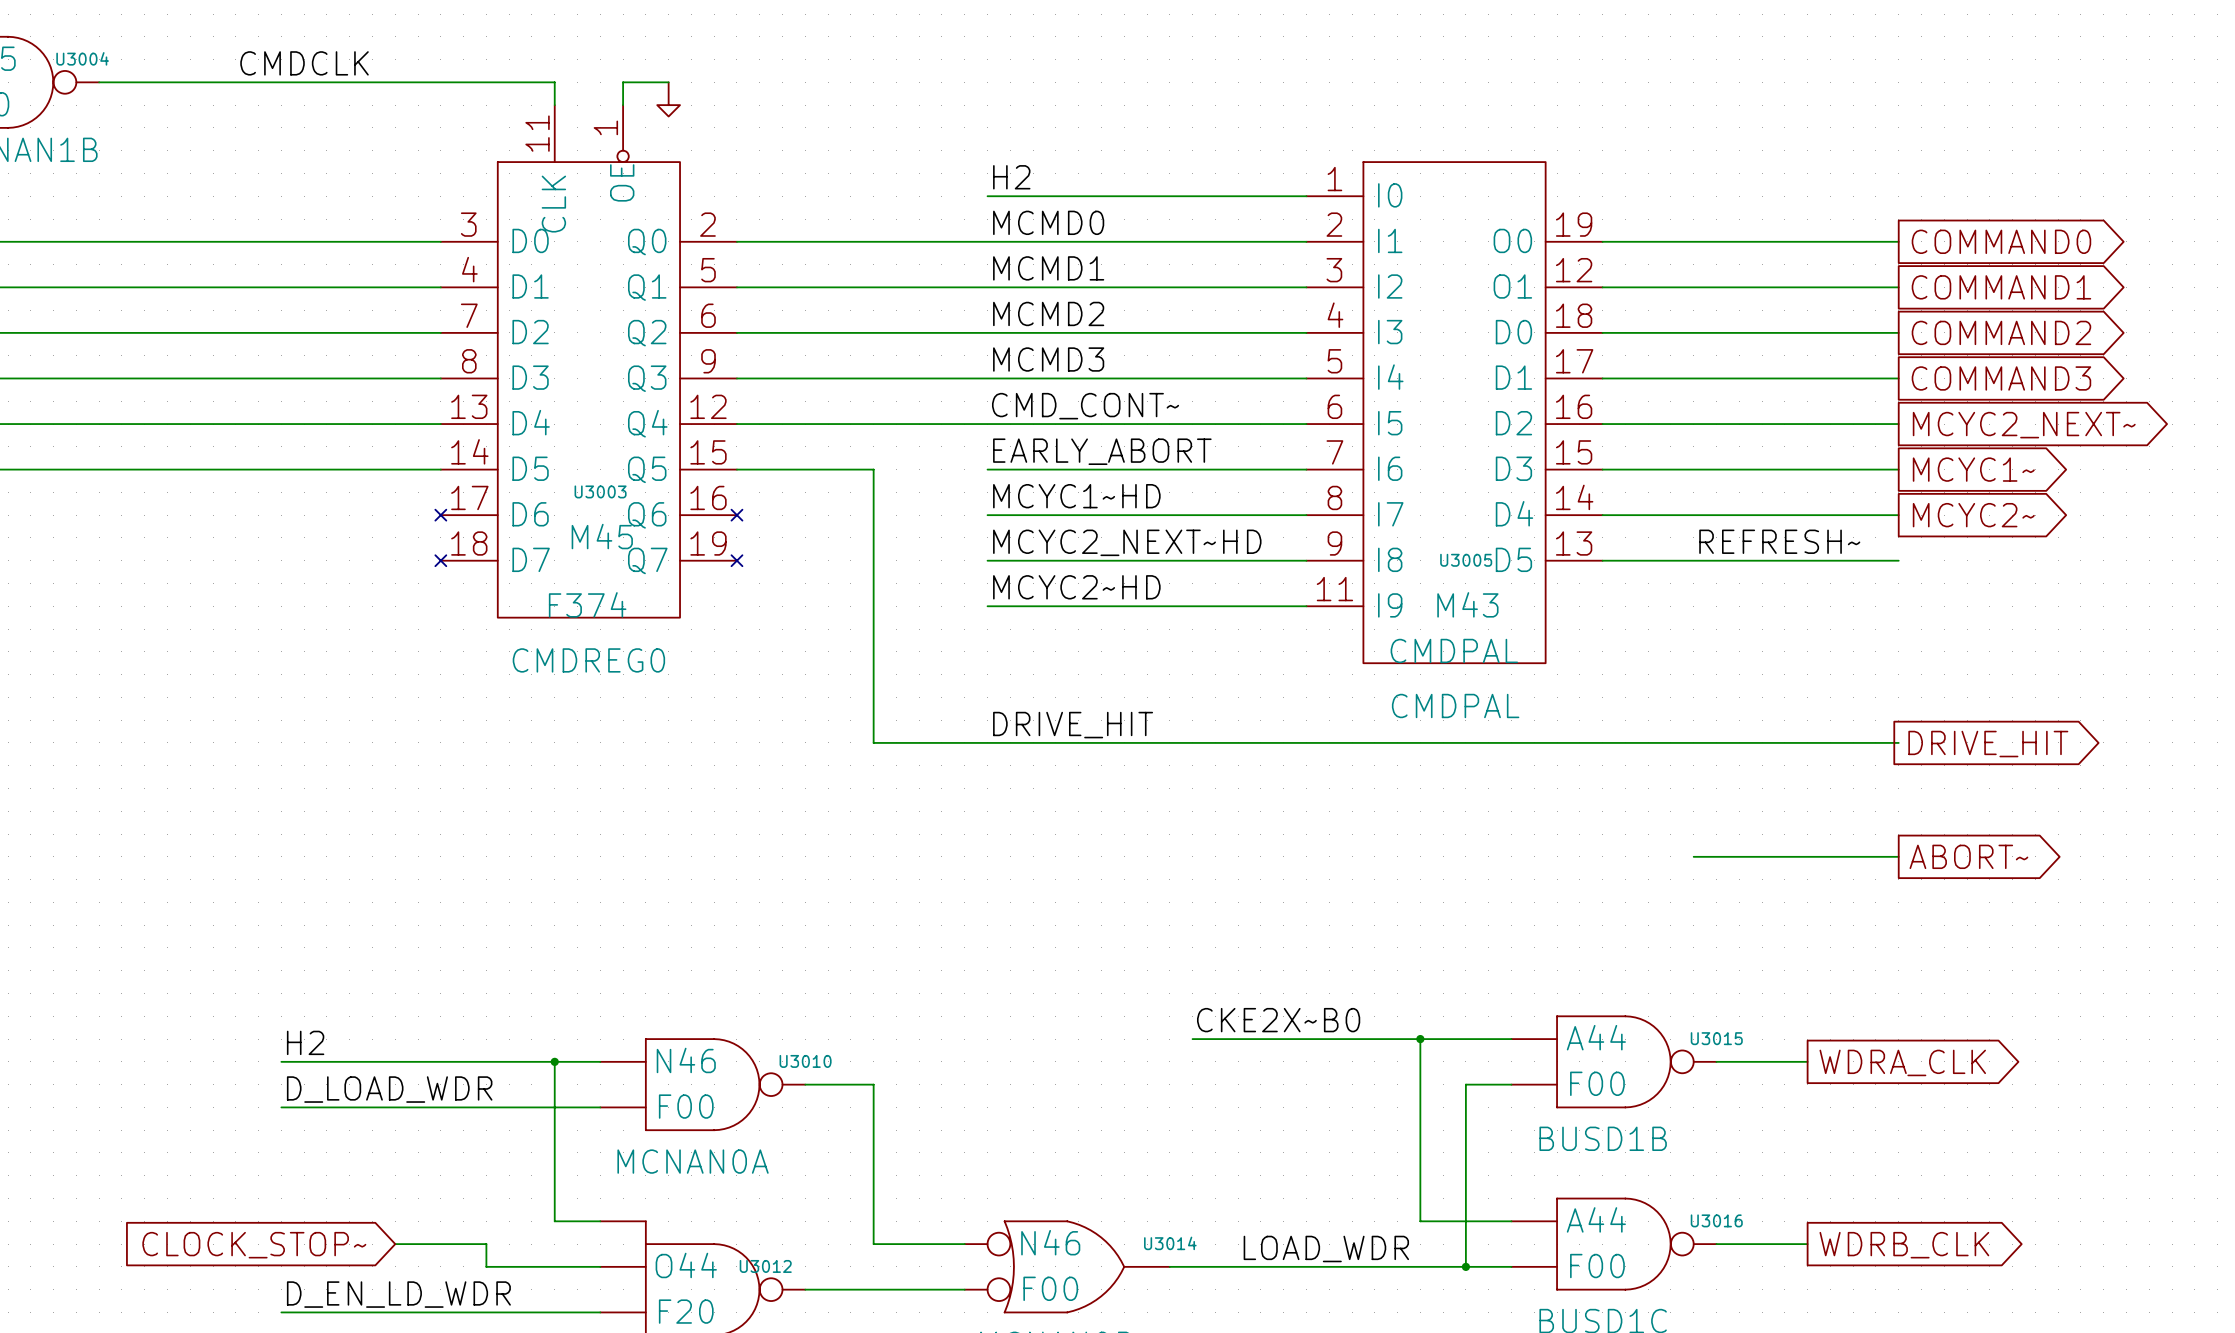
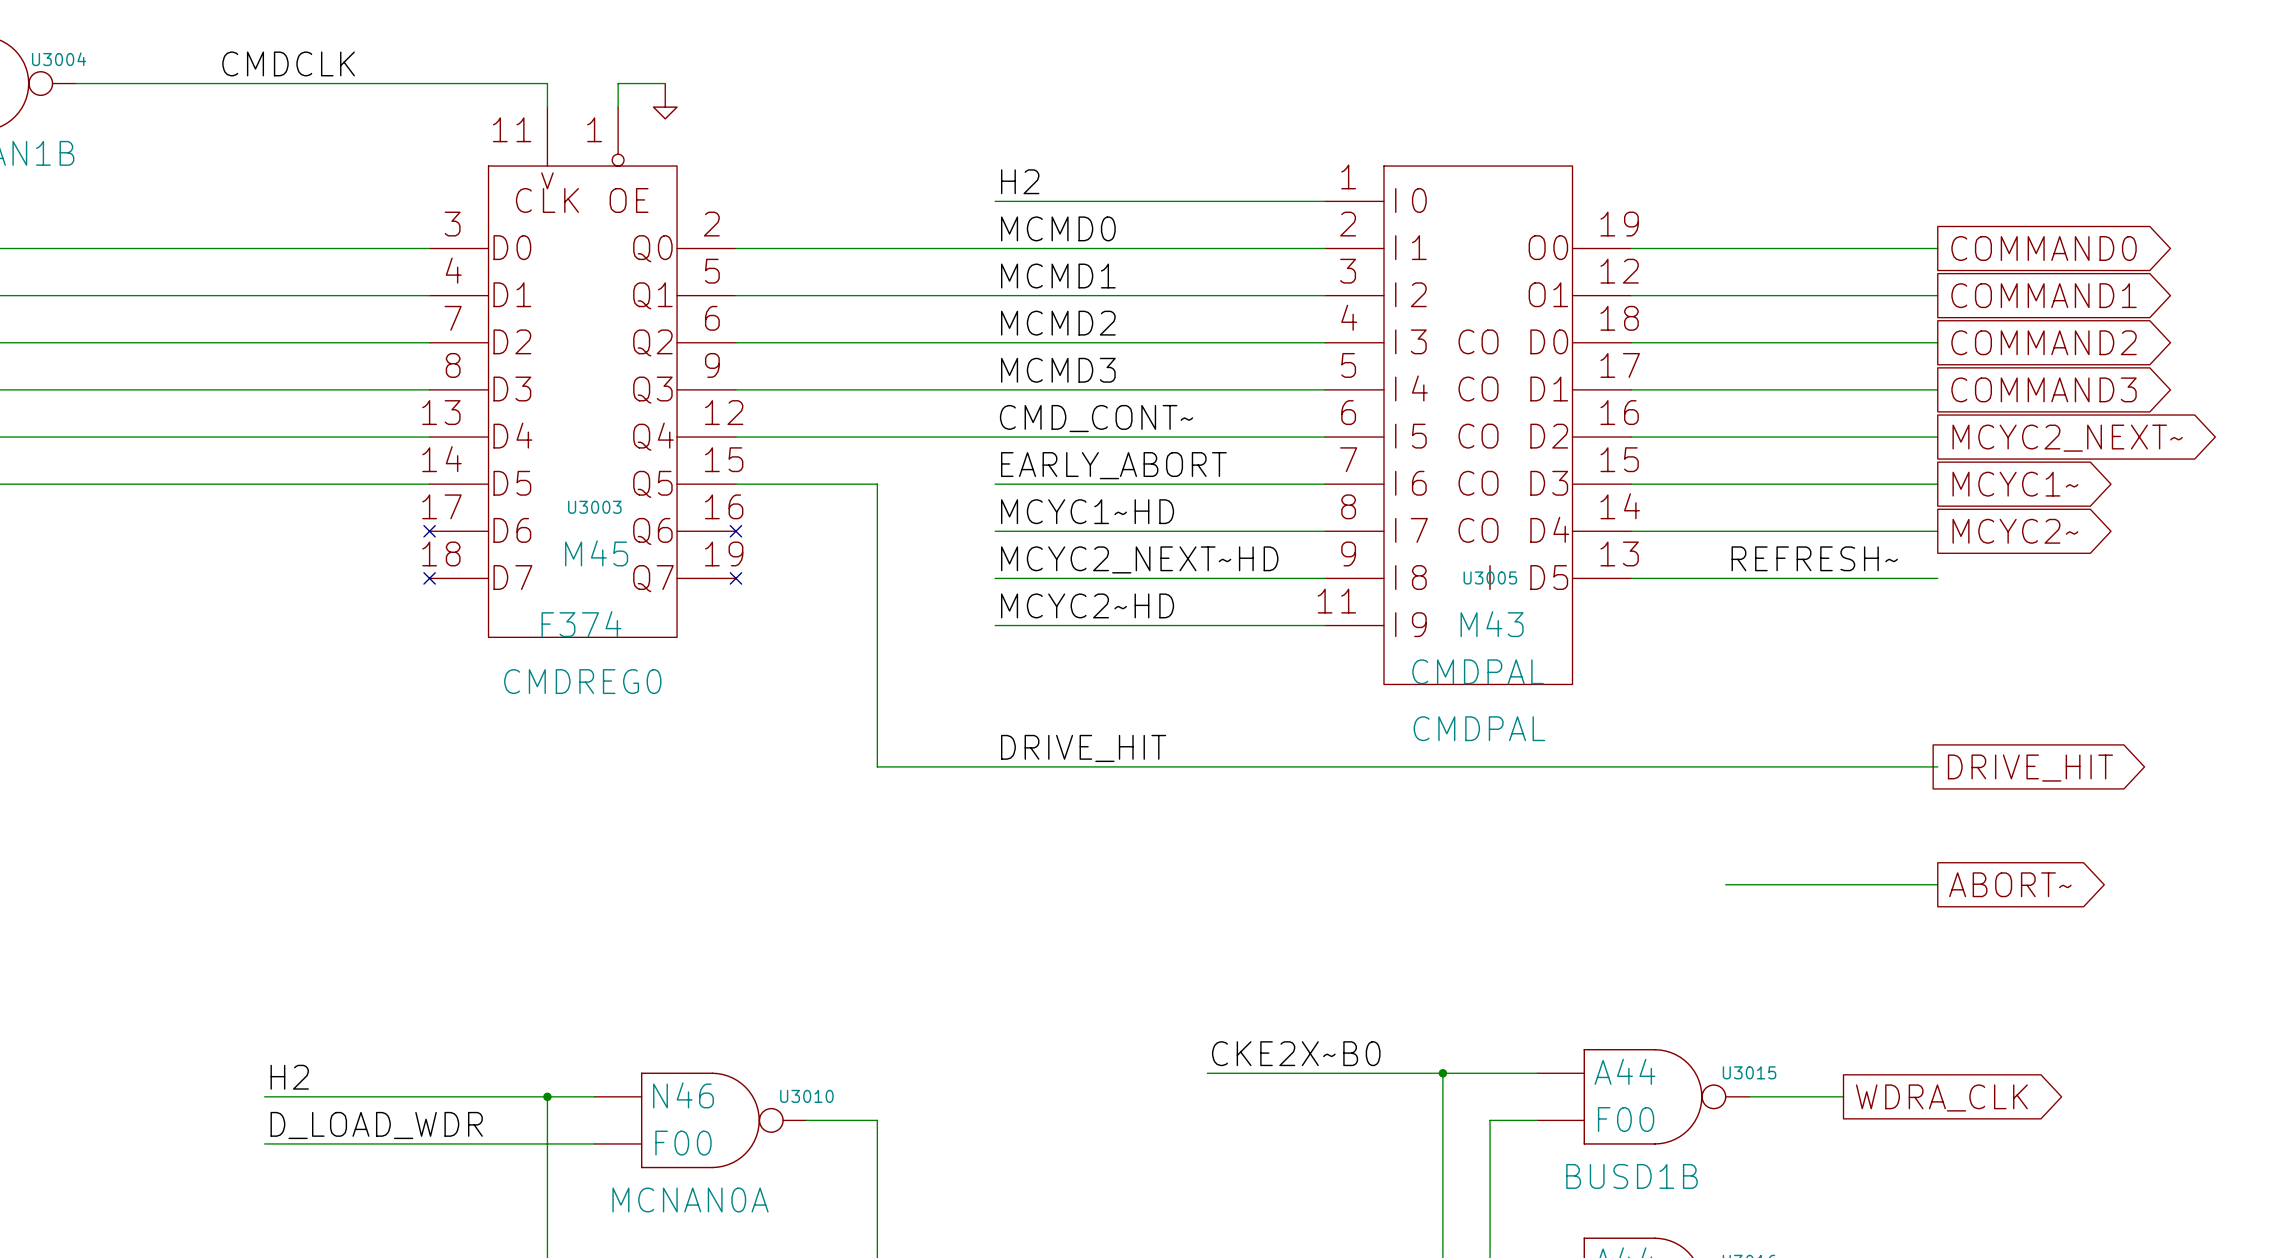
U3003 symbol: [440, 105, 737, 618] -> [429, 107, 736, 638]
U3005 symbol: [1306, 162, 1603, 664] -> [1325, 166, 1632, 685]

